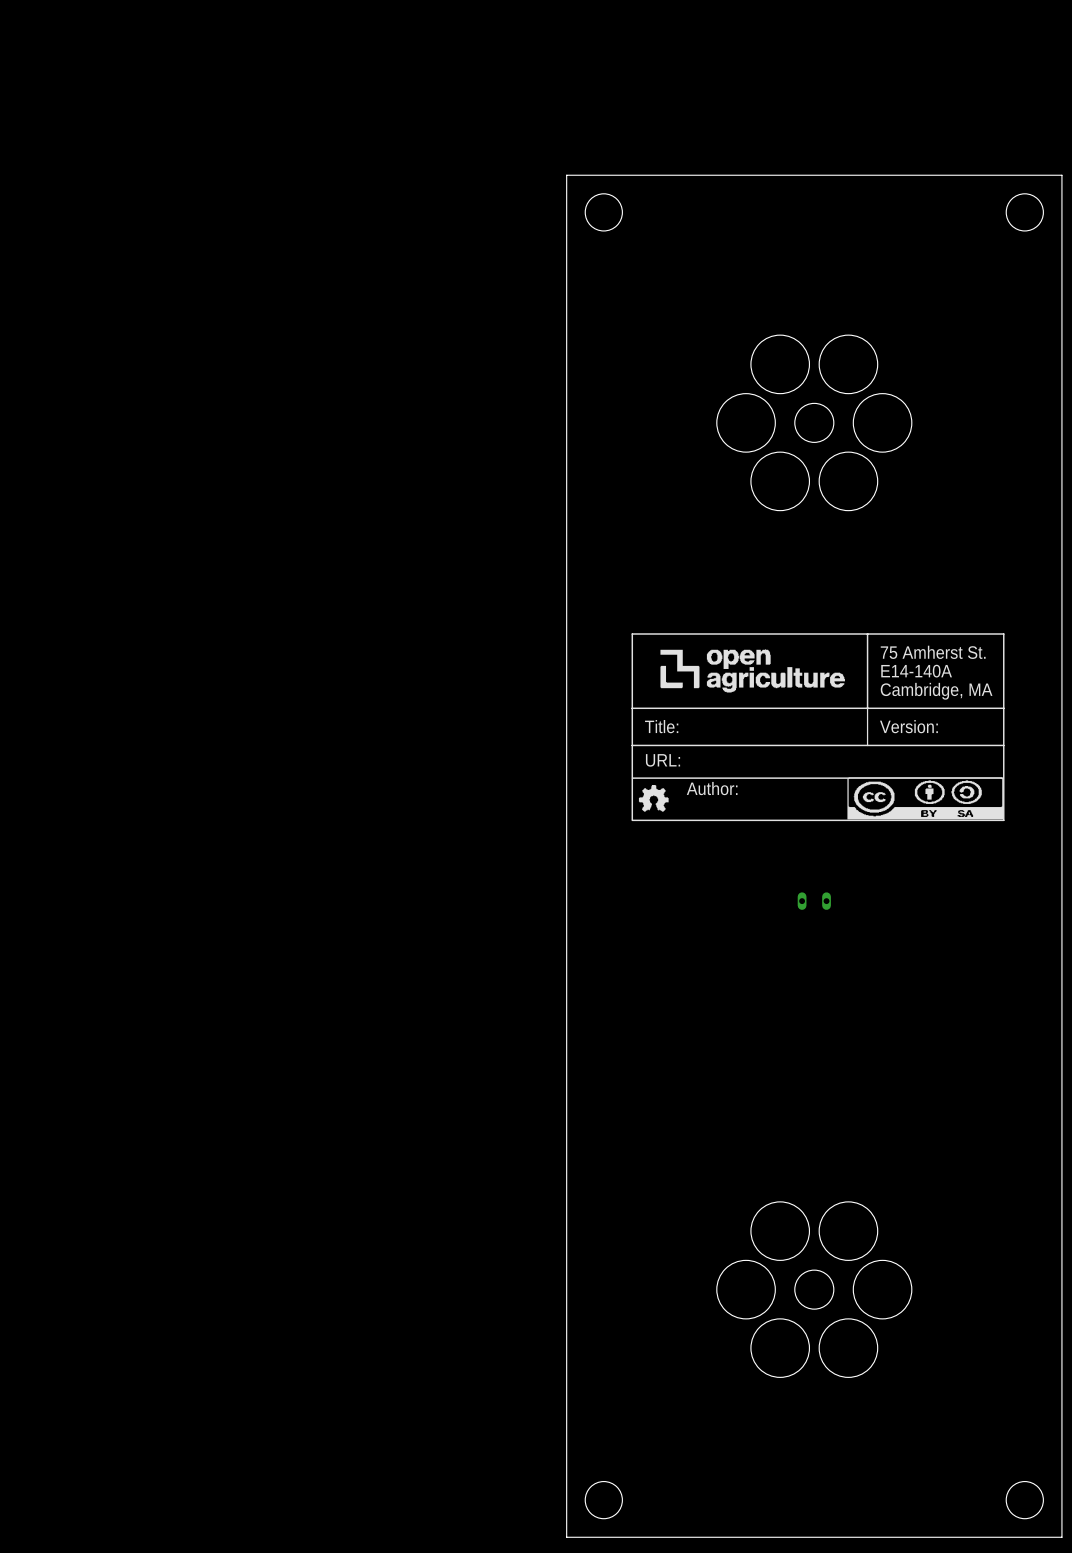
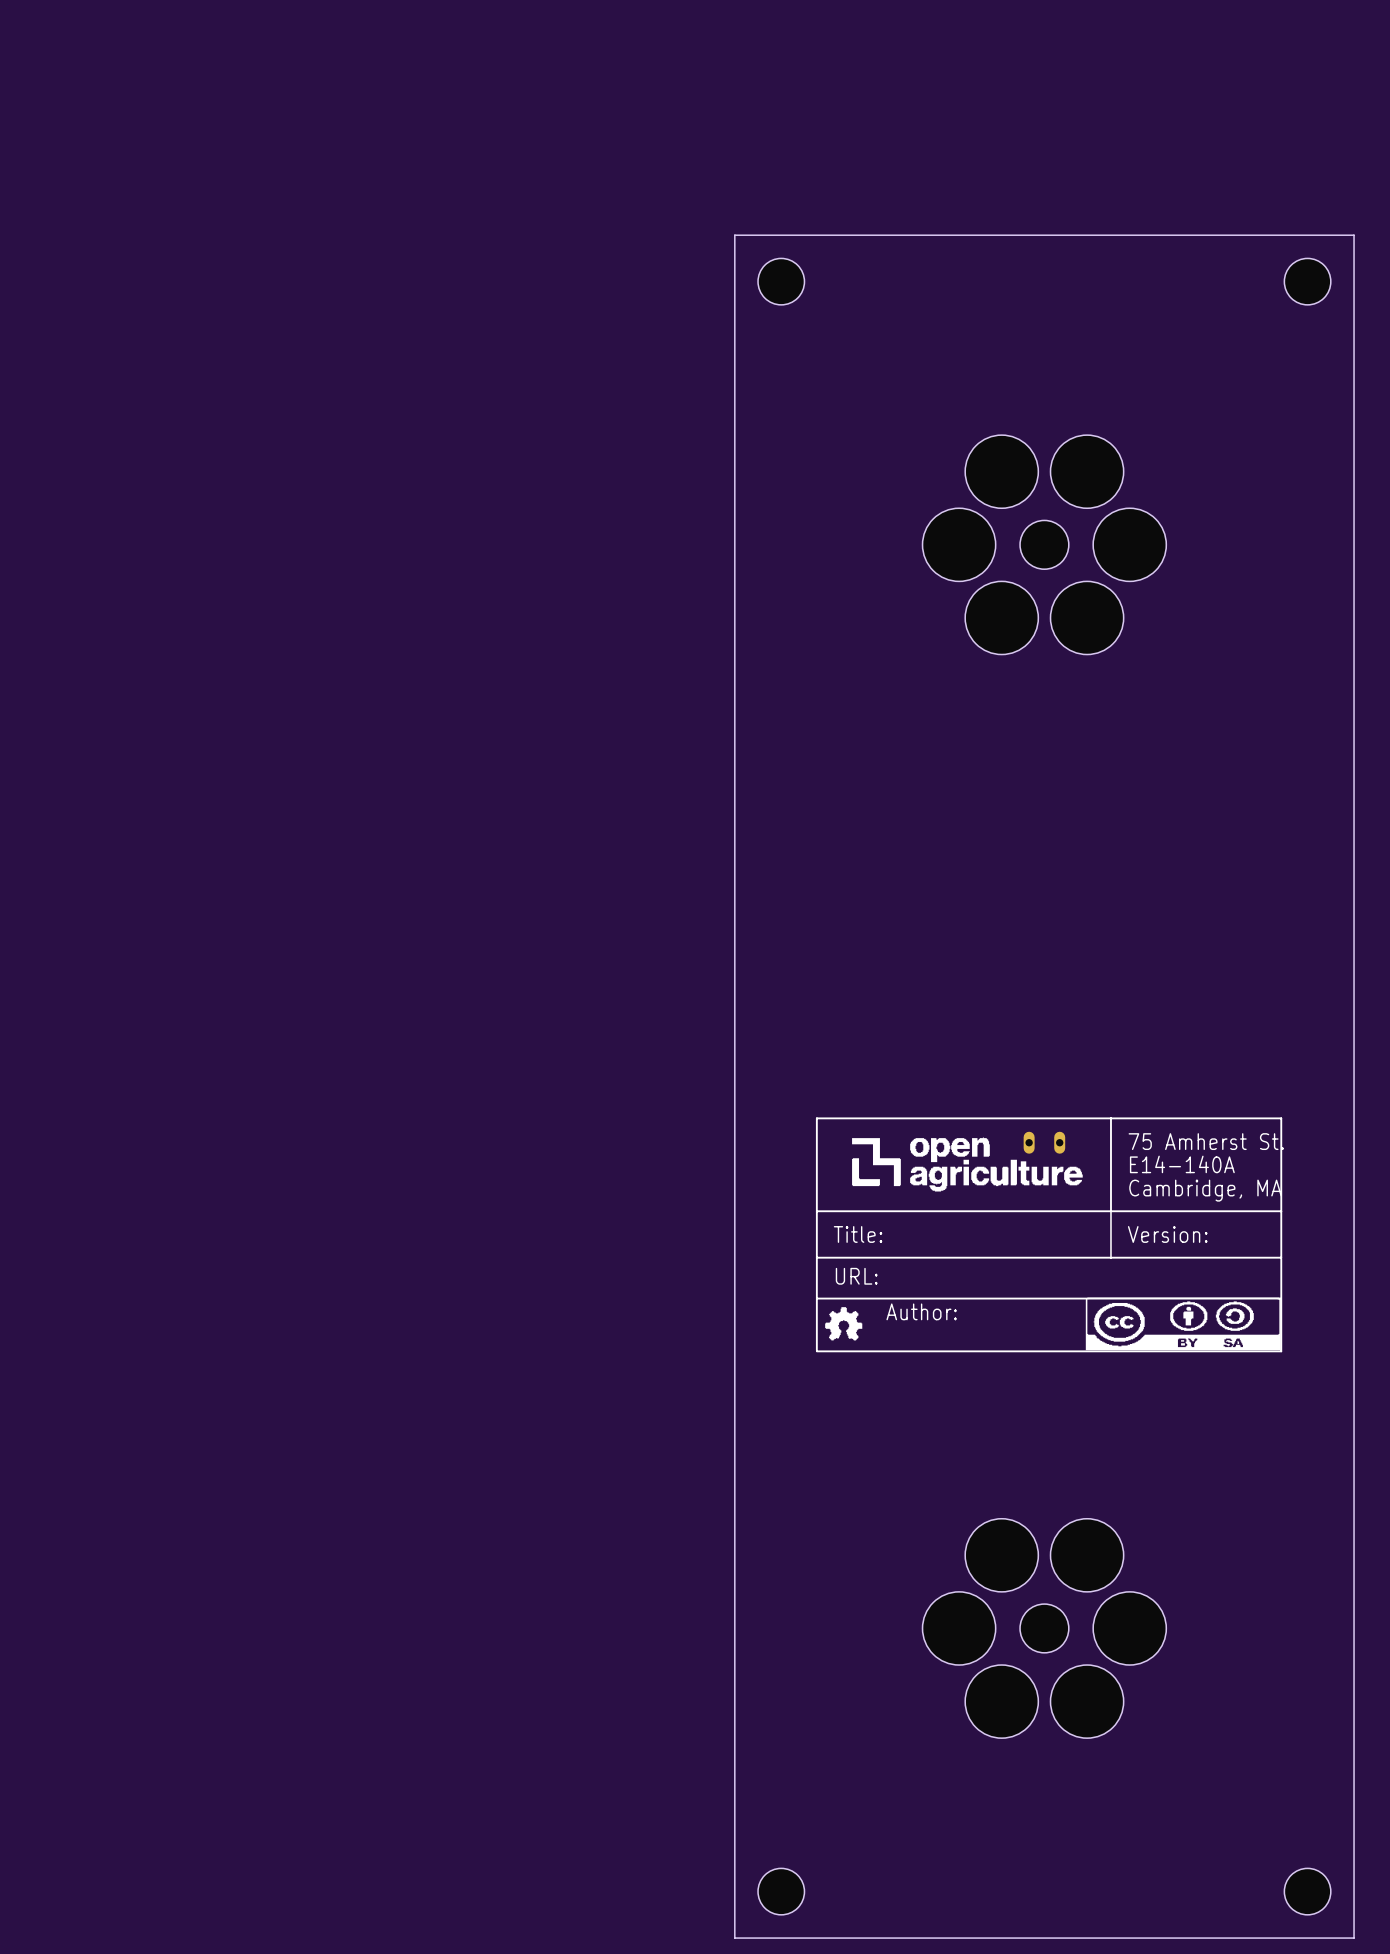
drawing: [631, 633, 1005, 822] -> none
drawing: none -> [815, 1117, 1283, 1353]

